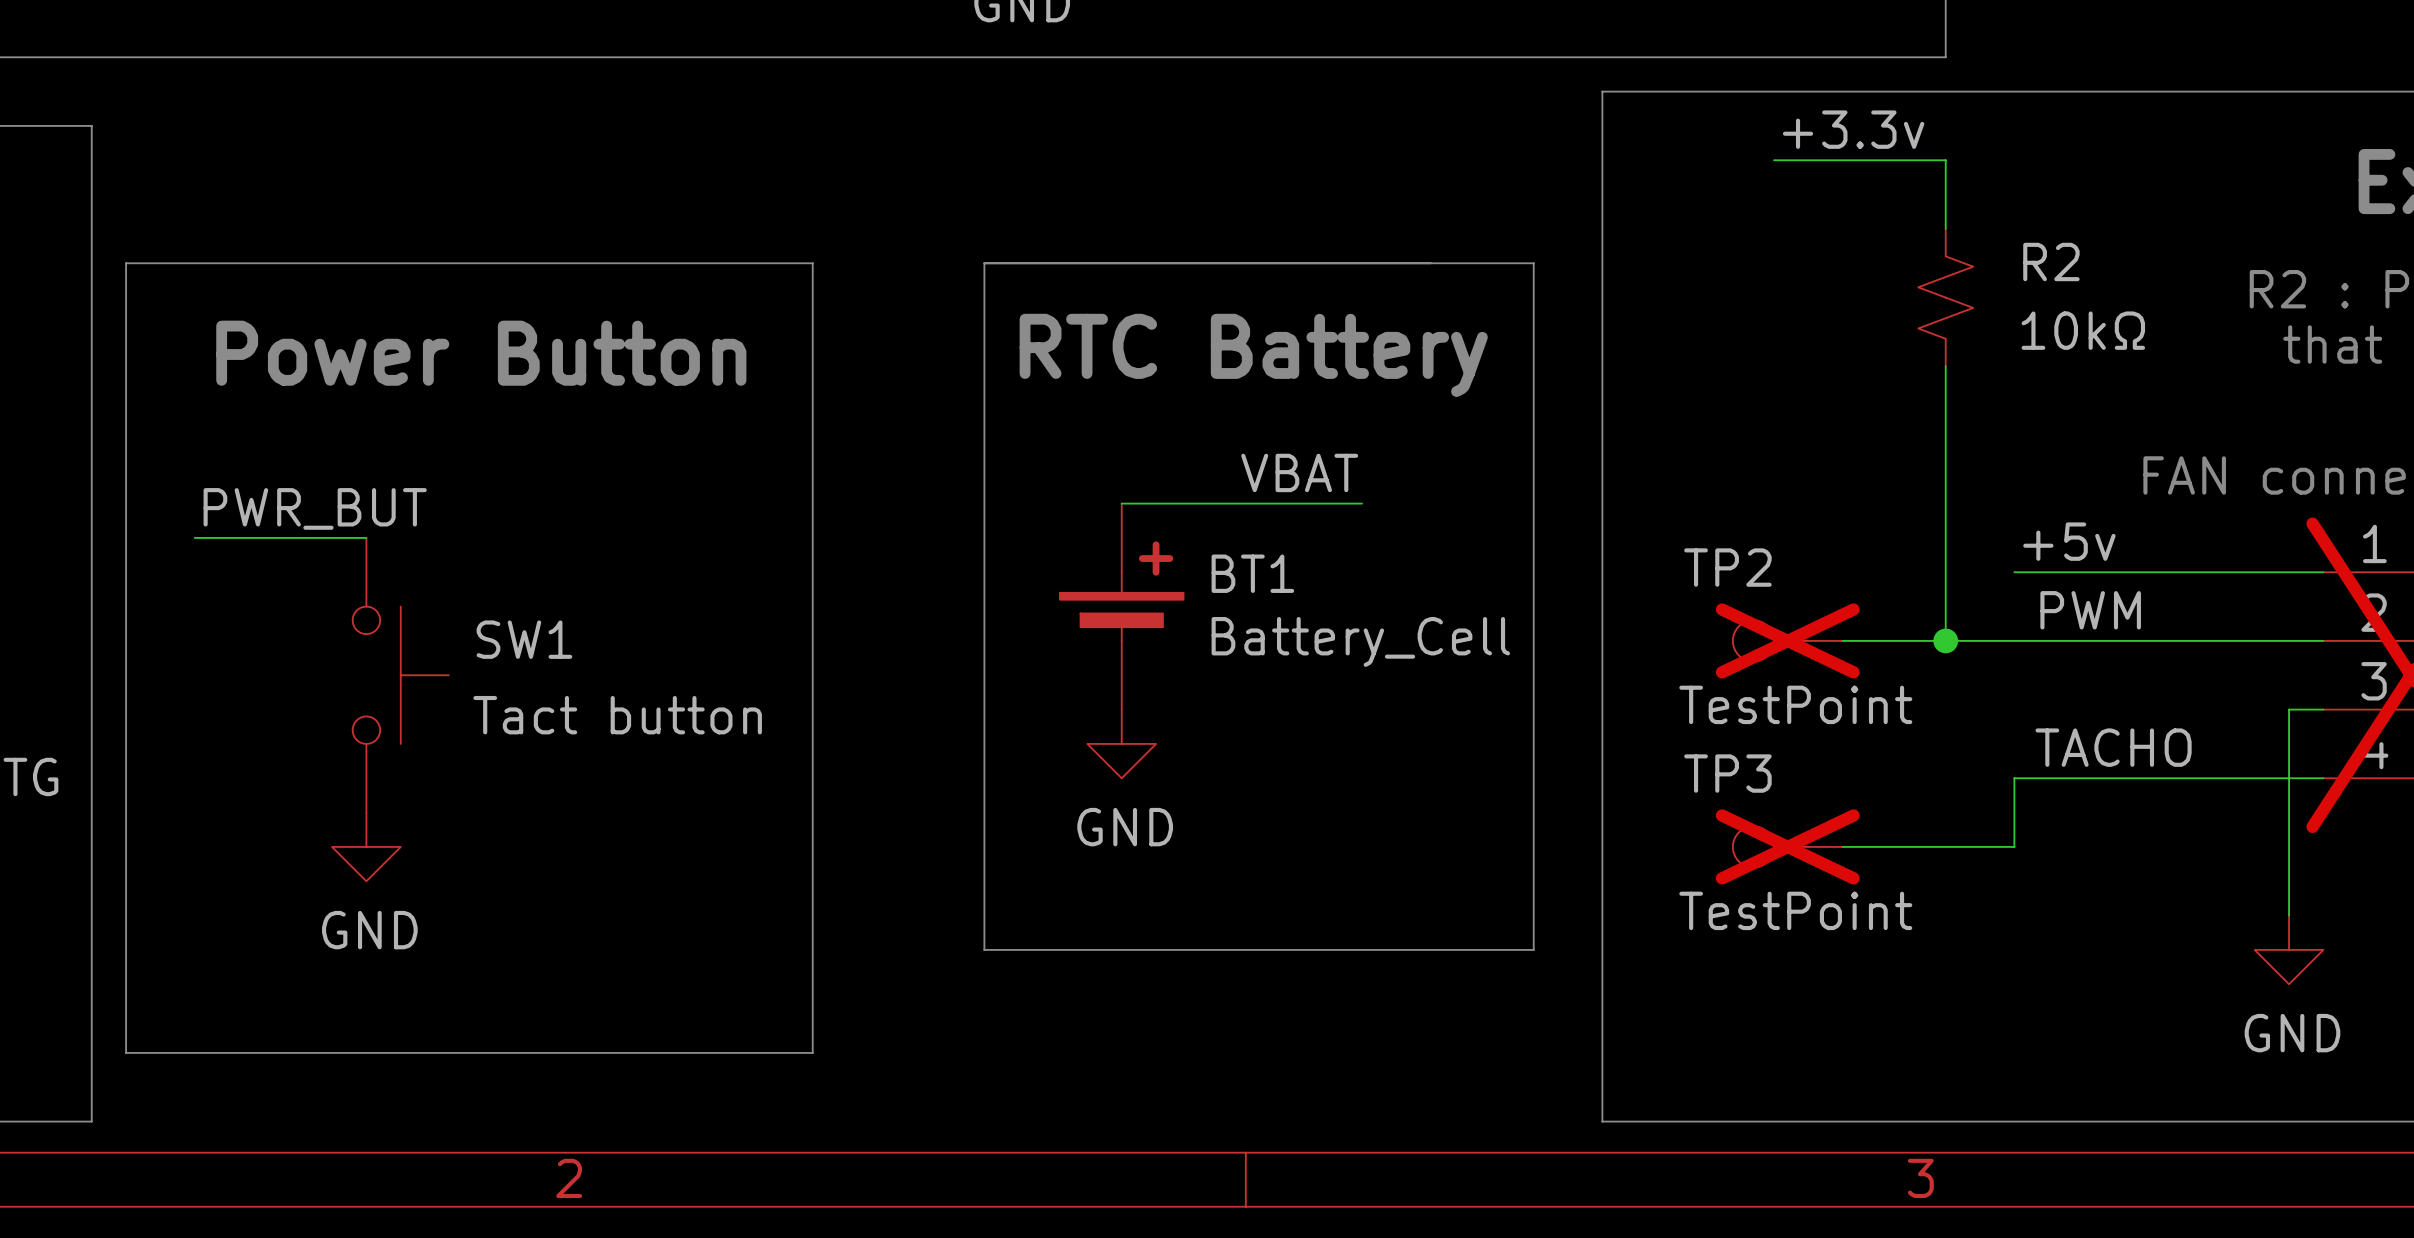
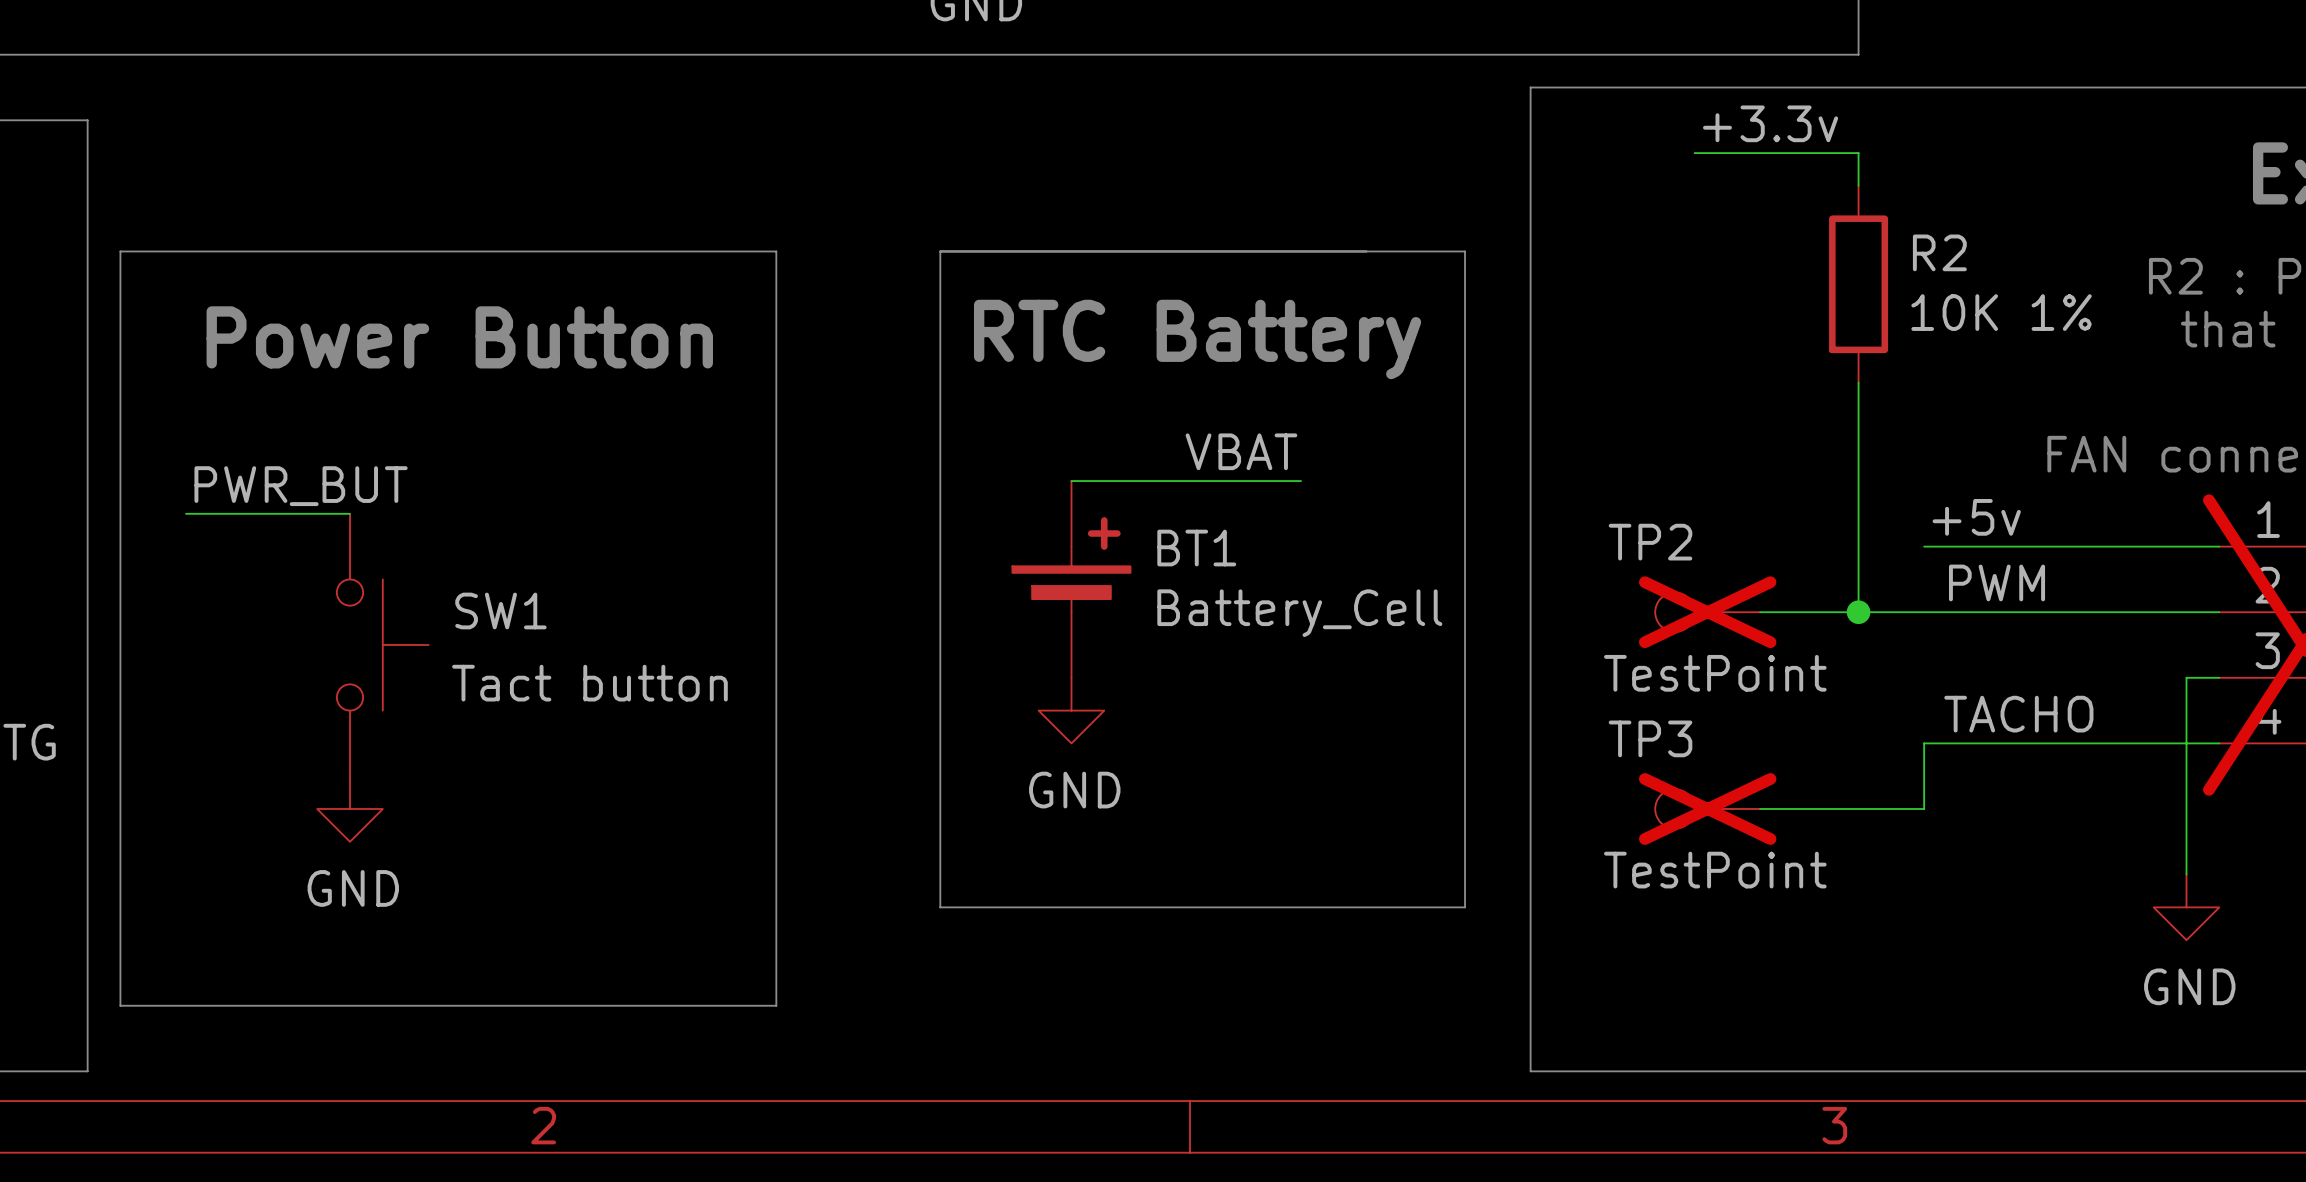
R2 symbol: [1918, 228, 1974, 367] -> [1829, 185, 1889, 383]
R2 value: 10kΩ (2083, 330) -> 10K 1% (2001, 312)

